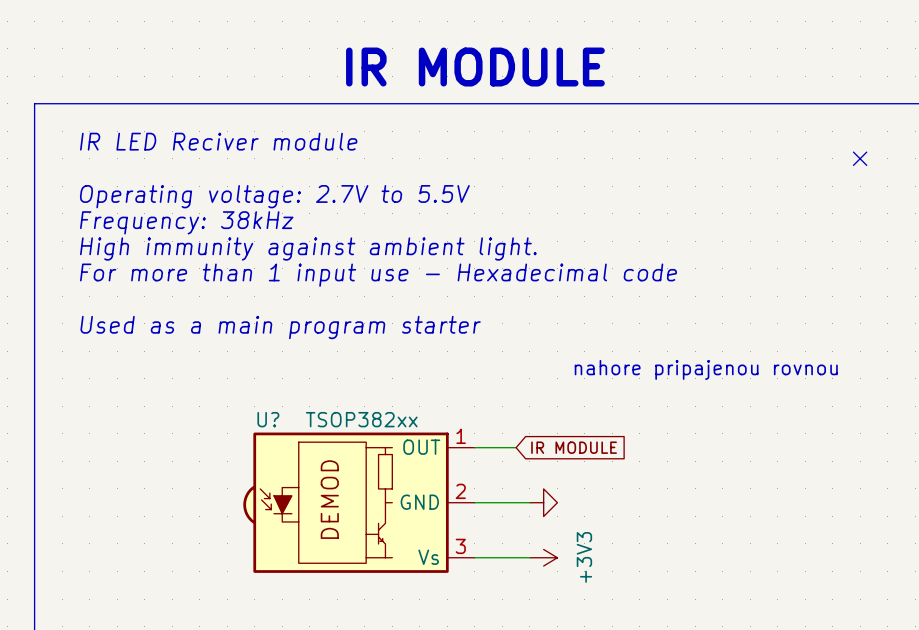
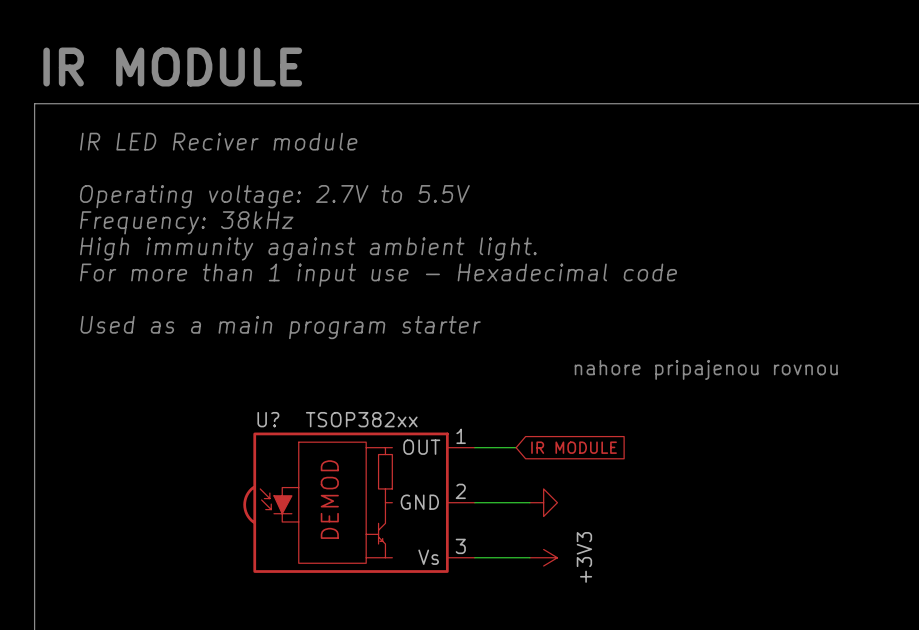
text: none -> IR MODULE (172, 67)
text: IR MODULE (475, 67) -> none
no-connect mark: (860, 158) -> none

